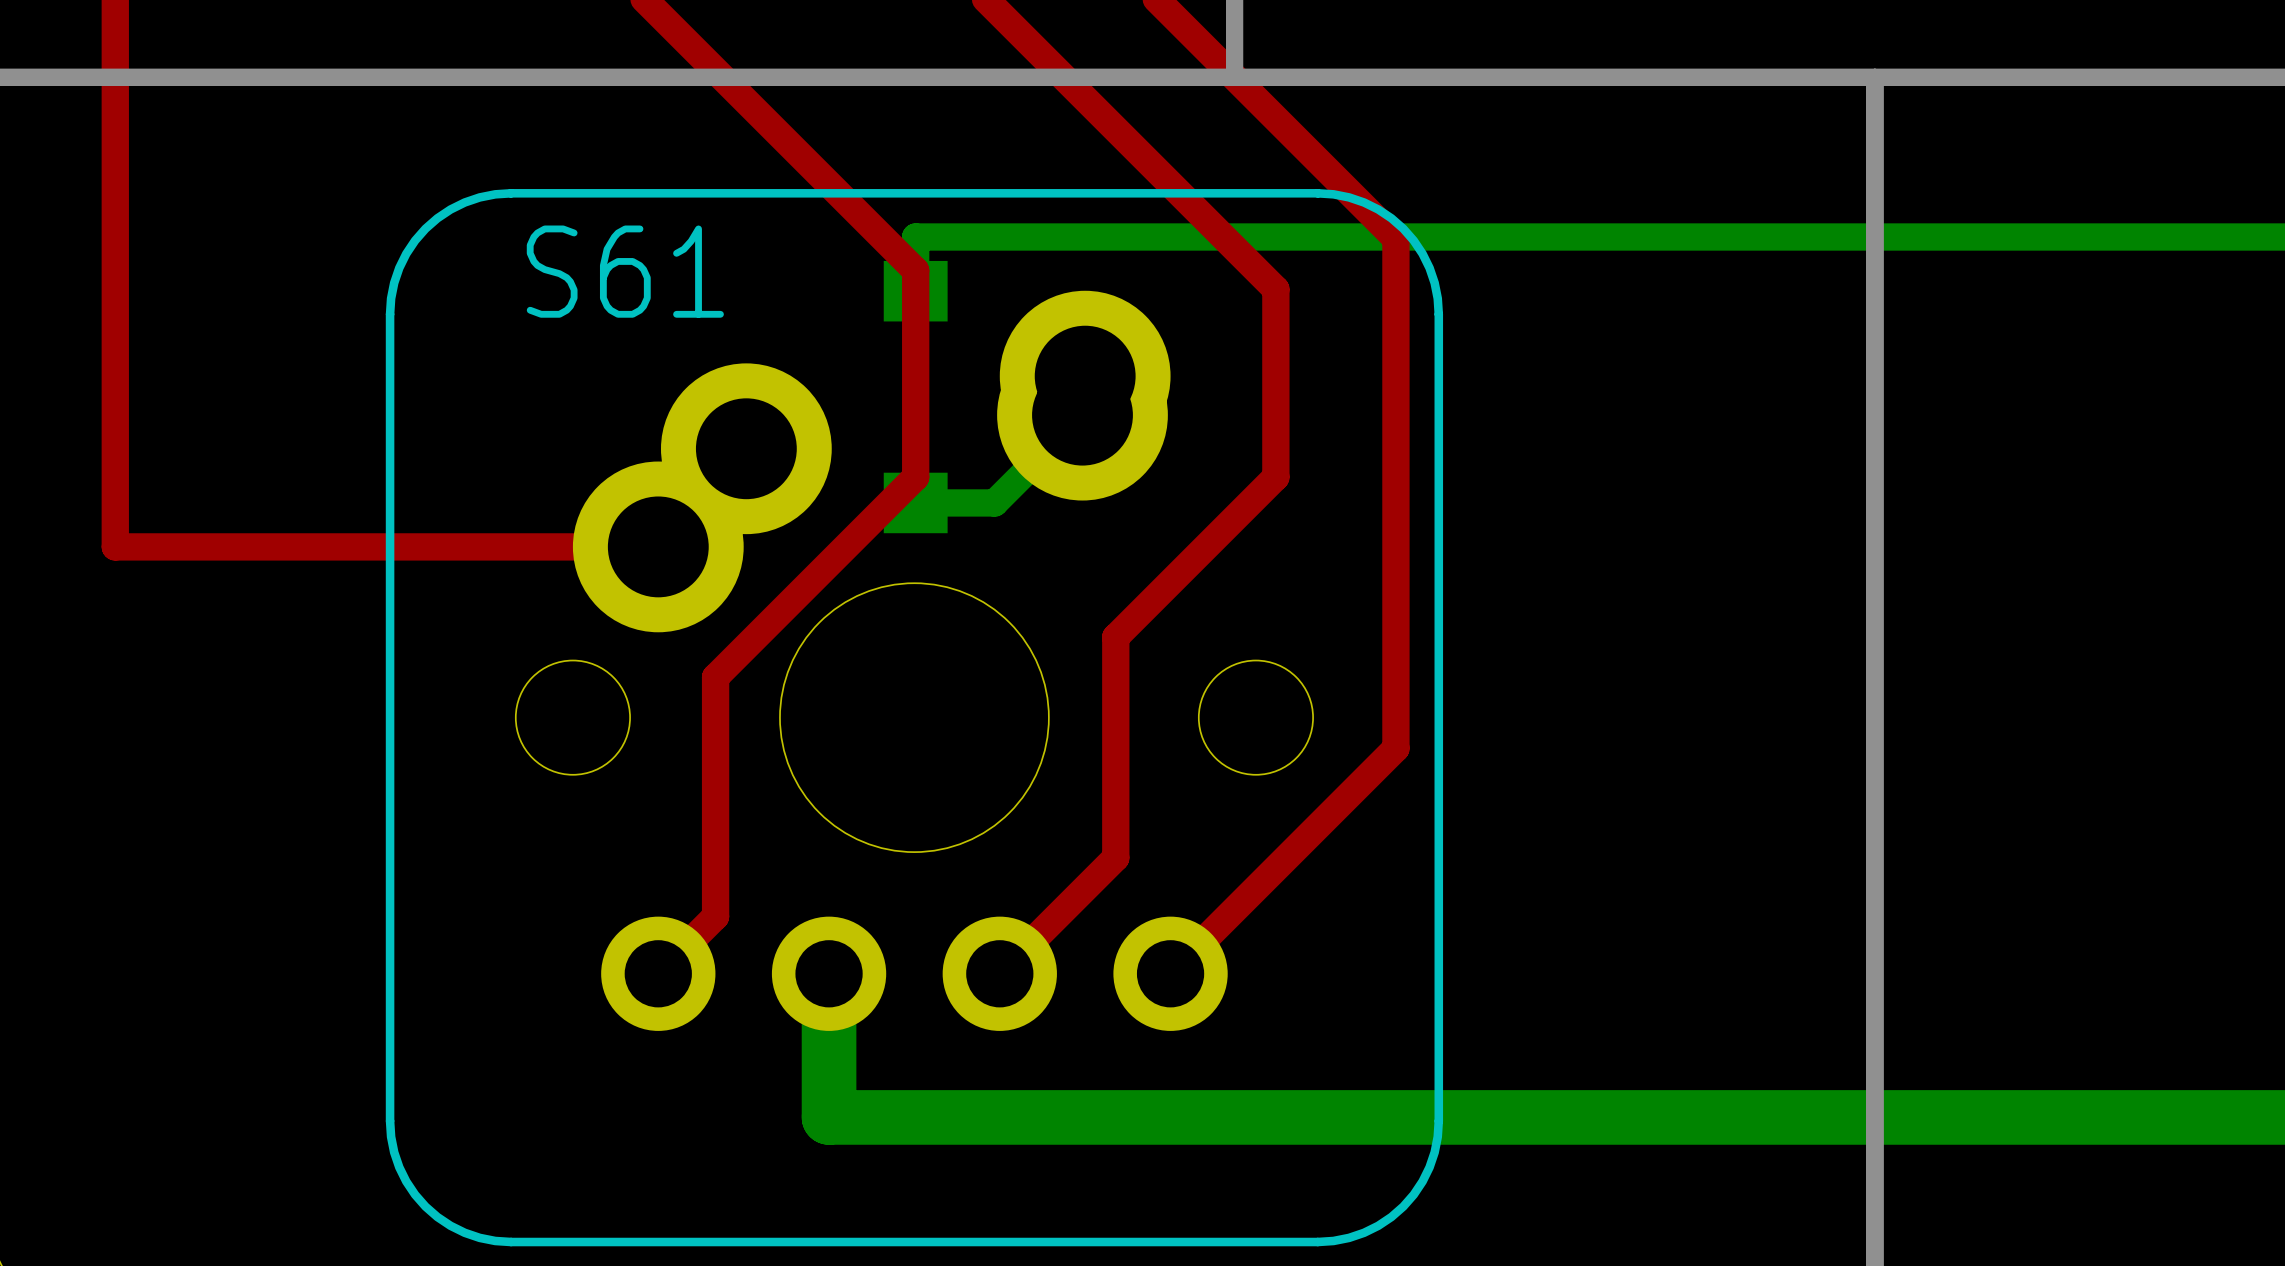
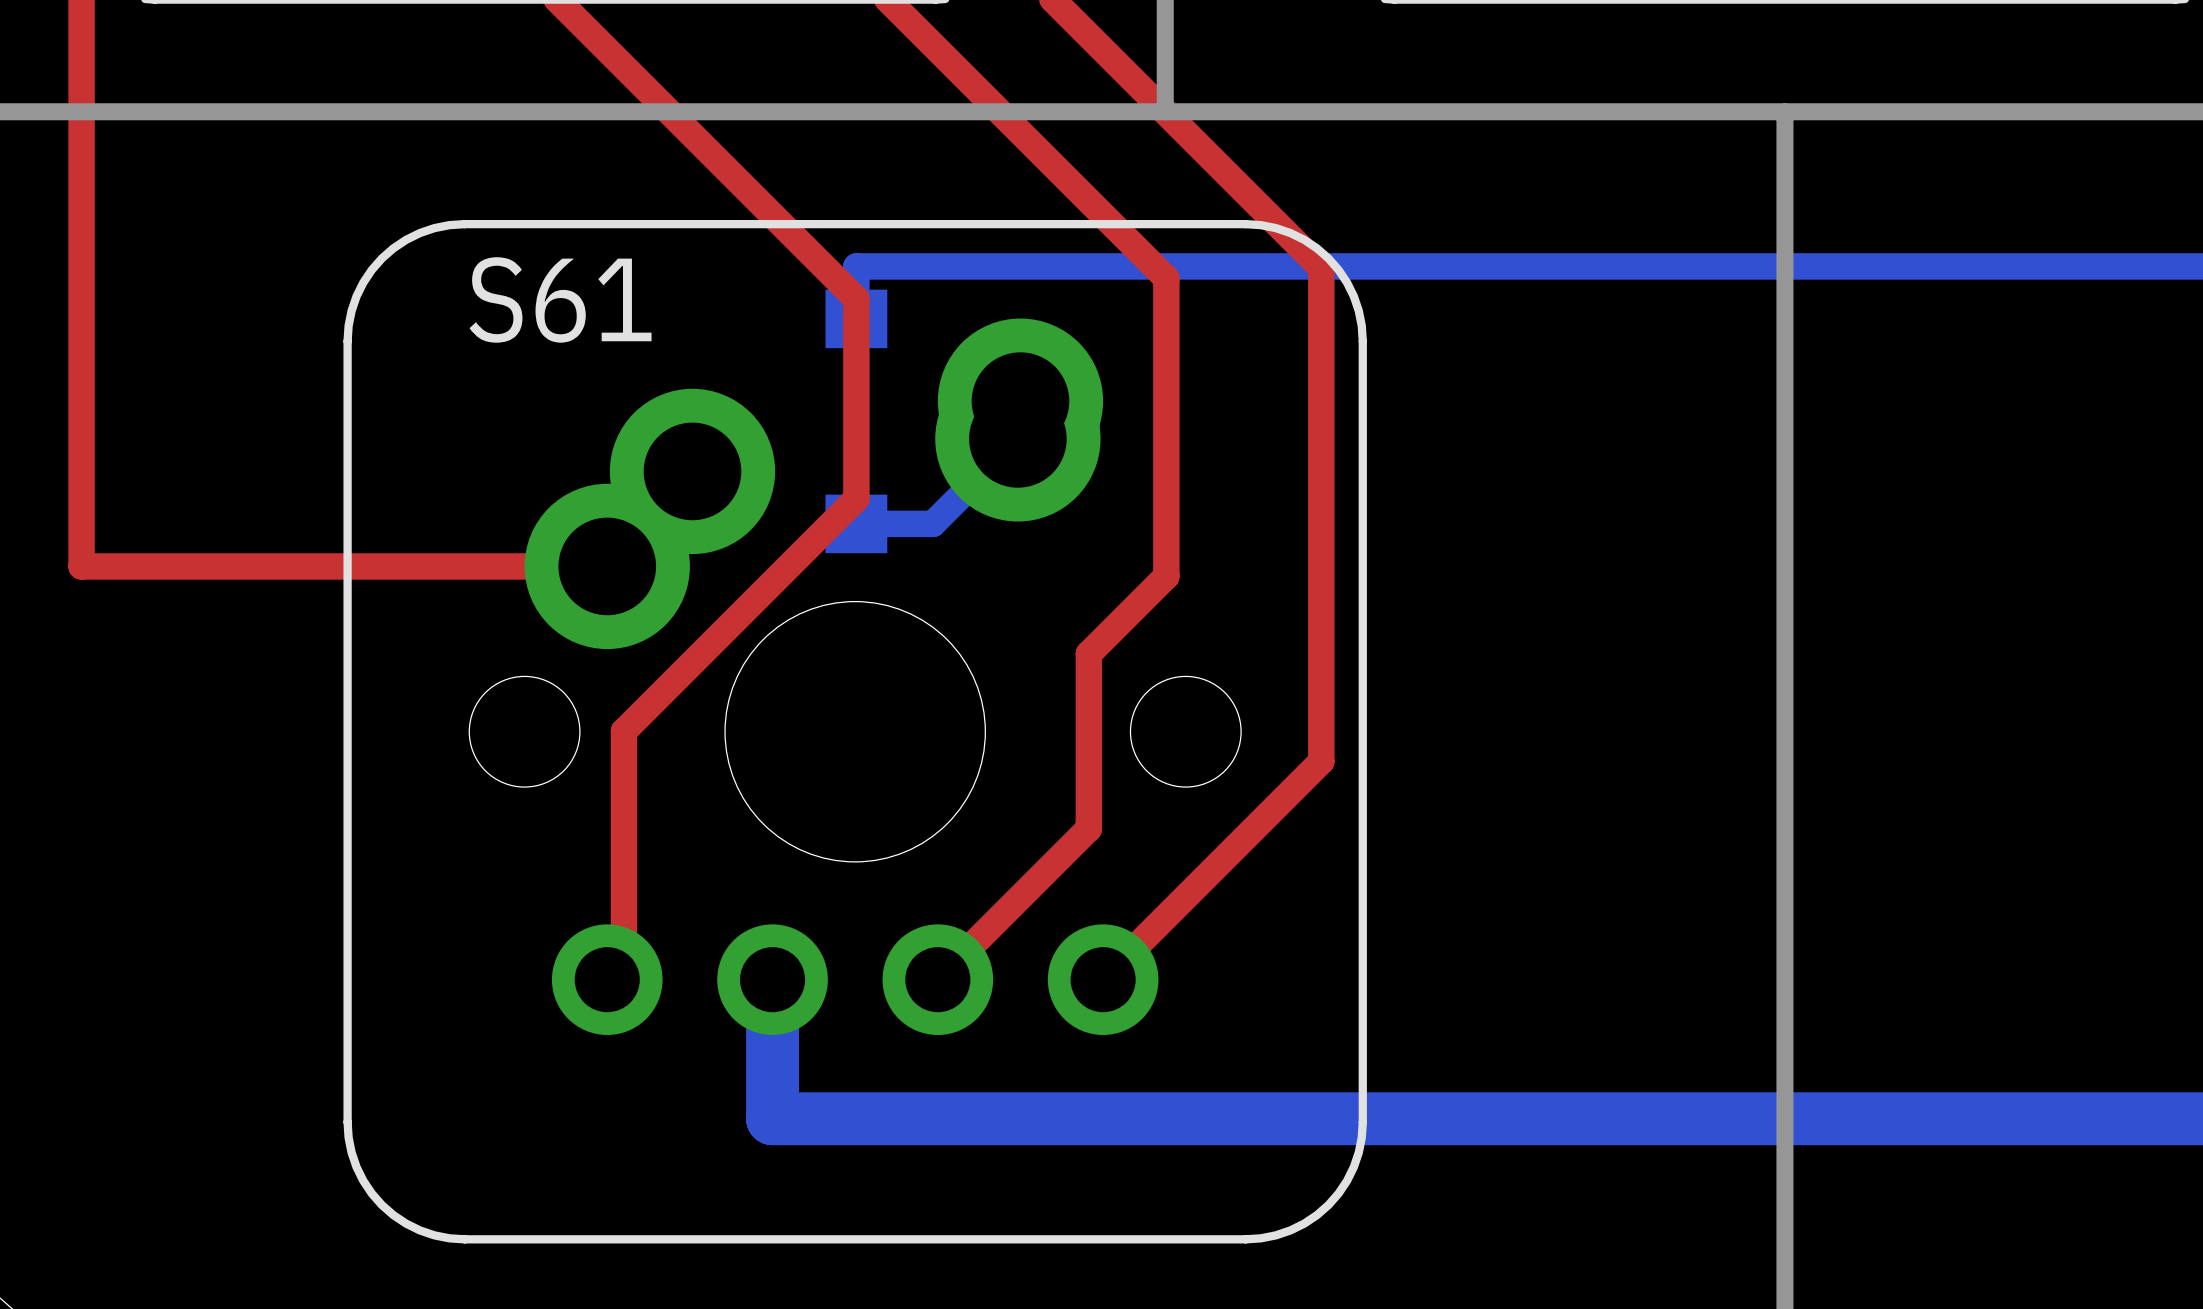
top track: (1235, 249) (1275, 289) (1275, 477) (1115, 637) (1115, 857) -> (1166, 278) (1166, 576) (1088, 653) (1088, 828) (1050, 867)
top track: (715, 677) (715, 916) (675, 956) -> (662, 692) (623, 731) (623, 962)

